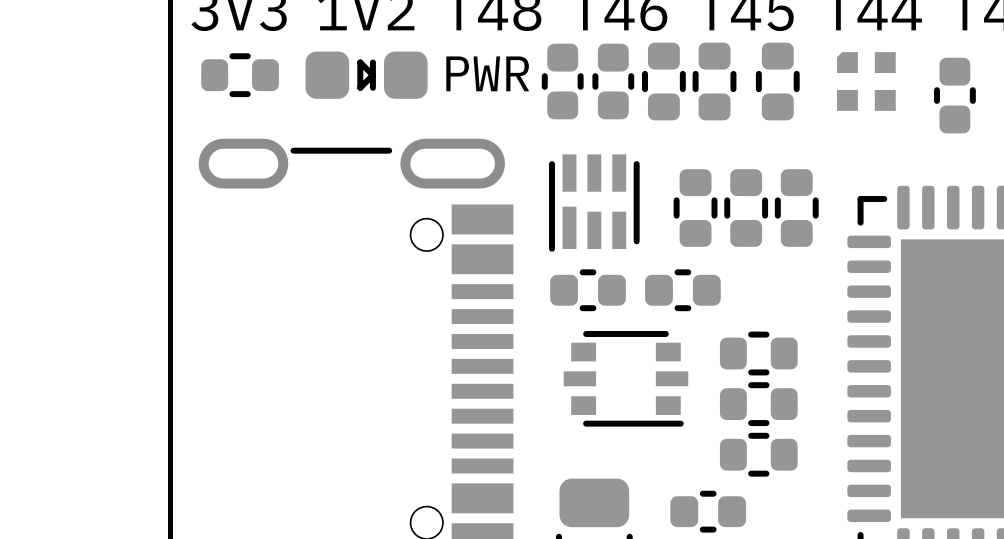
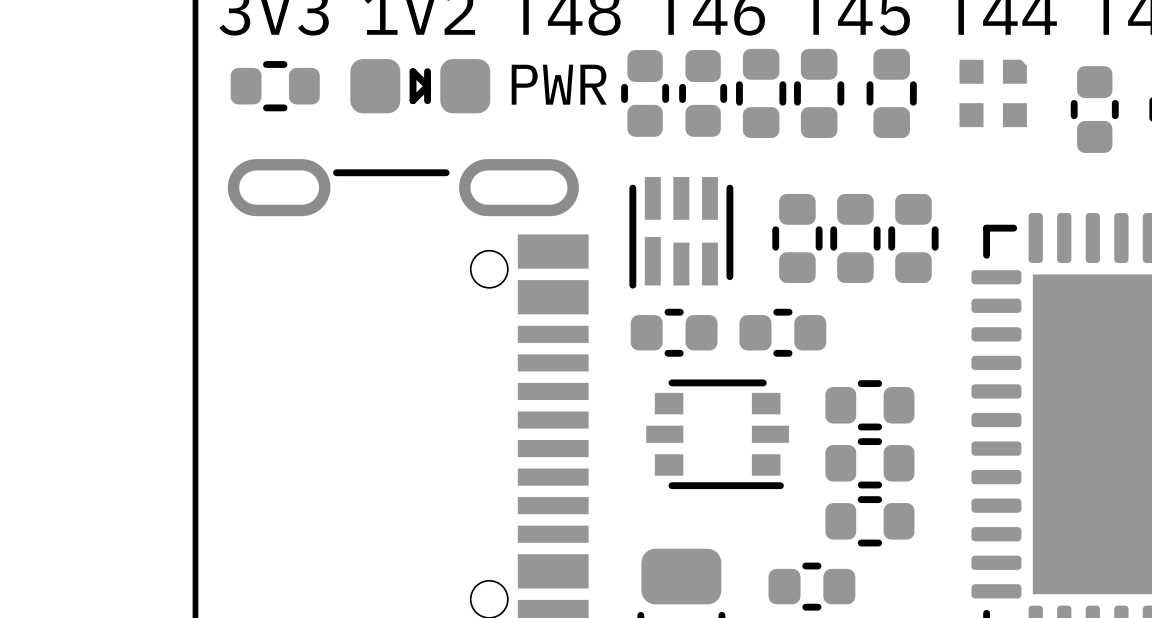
part rotation: 0° (866, 81) -> 90° clockwise (993, 93)

